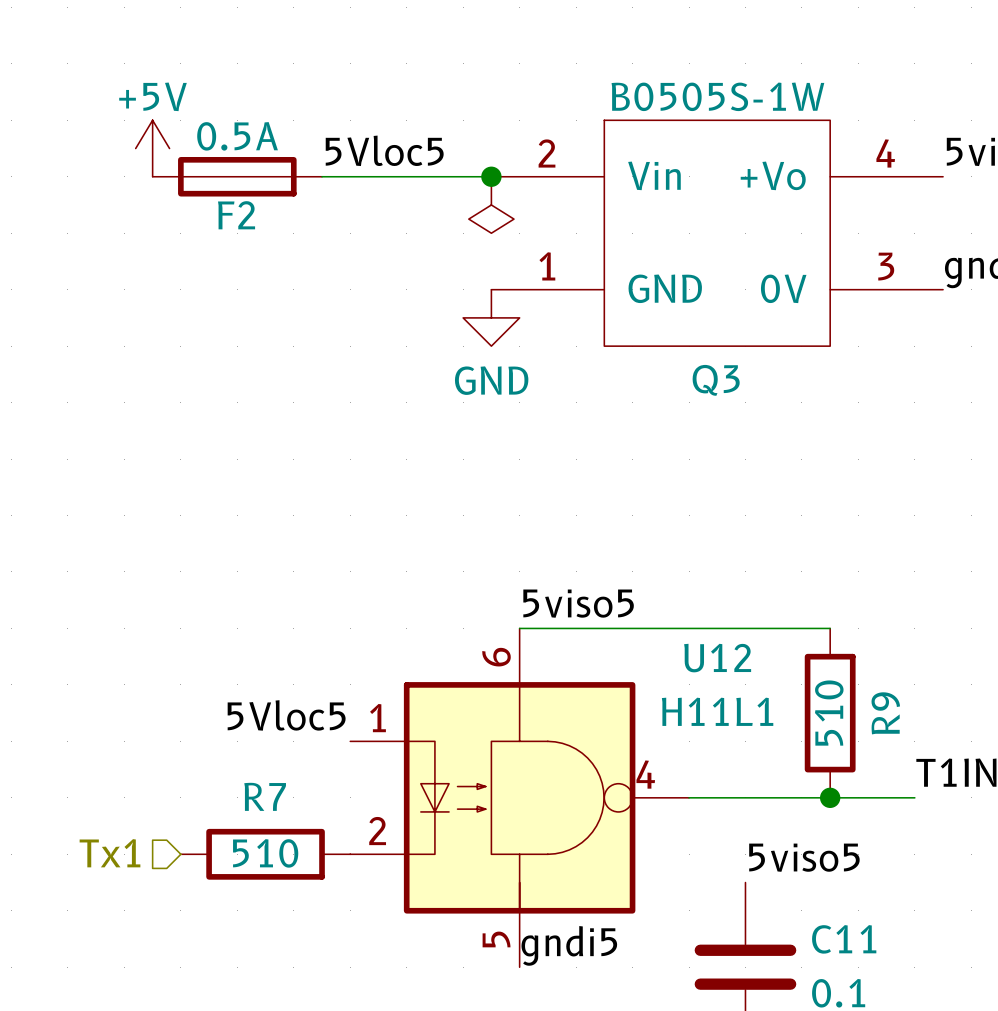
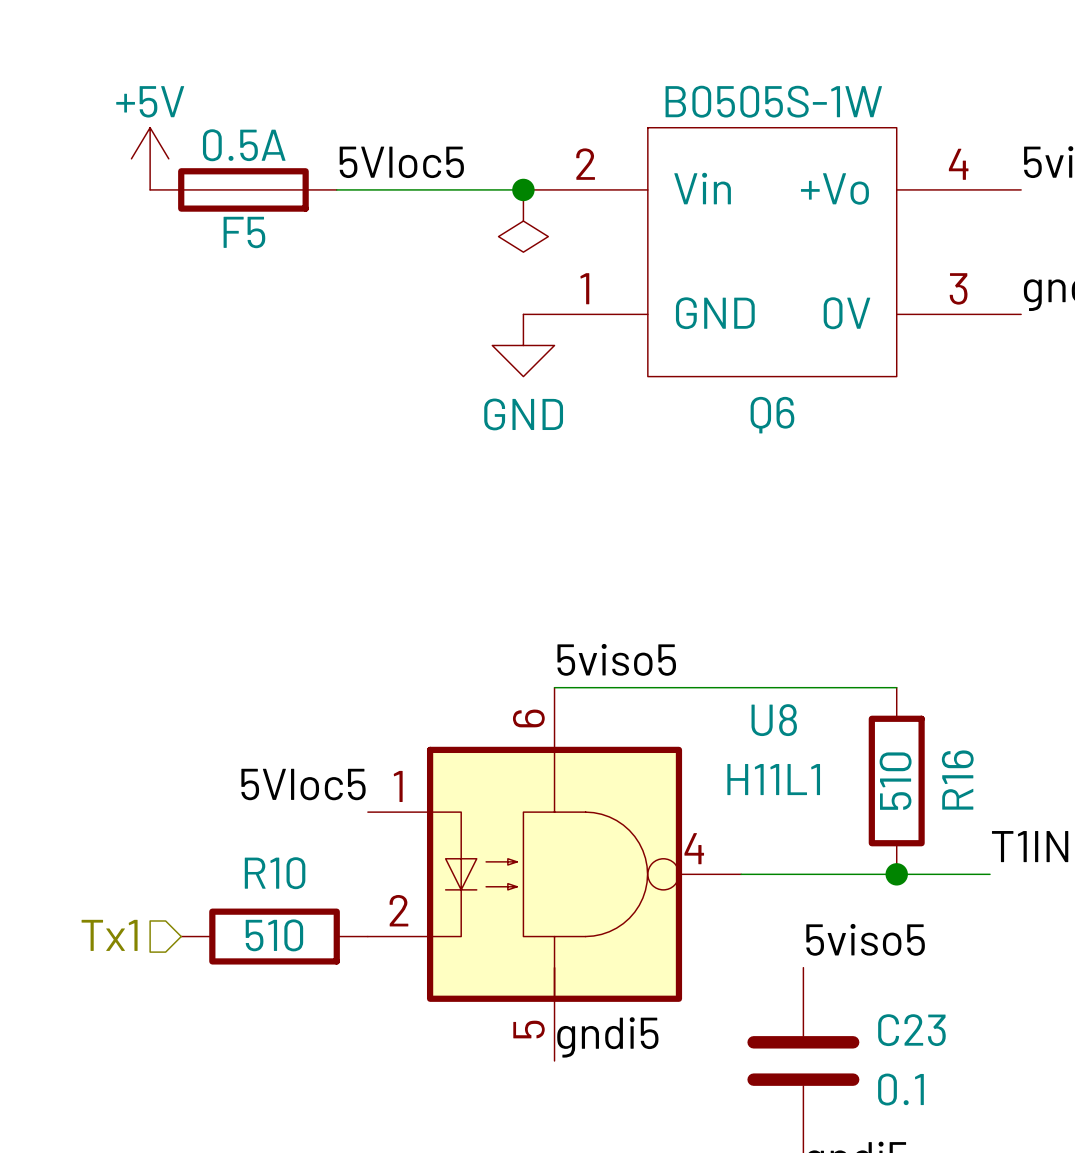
F2 name: F2 (236, 215) -> F5 (244, 232)
Q3 name: Q3 (716, 380) -> Q6 (772, 415)
U12 name: U12 (717, 658) -> U8 (774, 720)
R9 name: R9 (885, 713) -> R16 (957, 780)
R7 name: R7 (265, 796) -> R10 (275, 873)
C11 name: C11 (844, 939) -> C23 (911, 1030)

